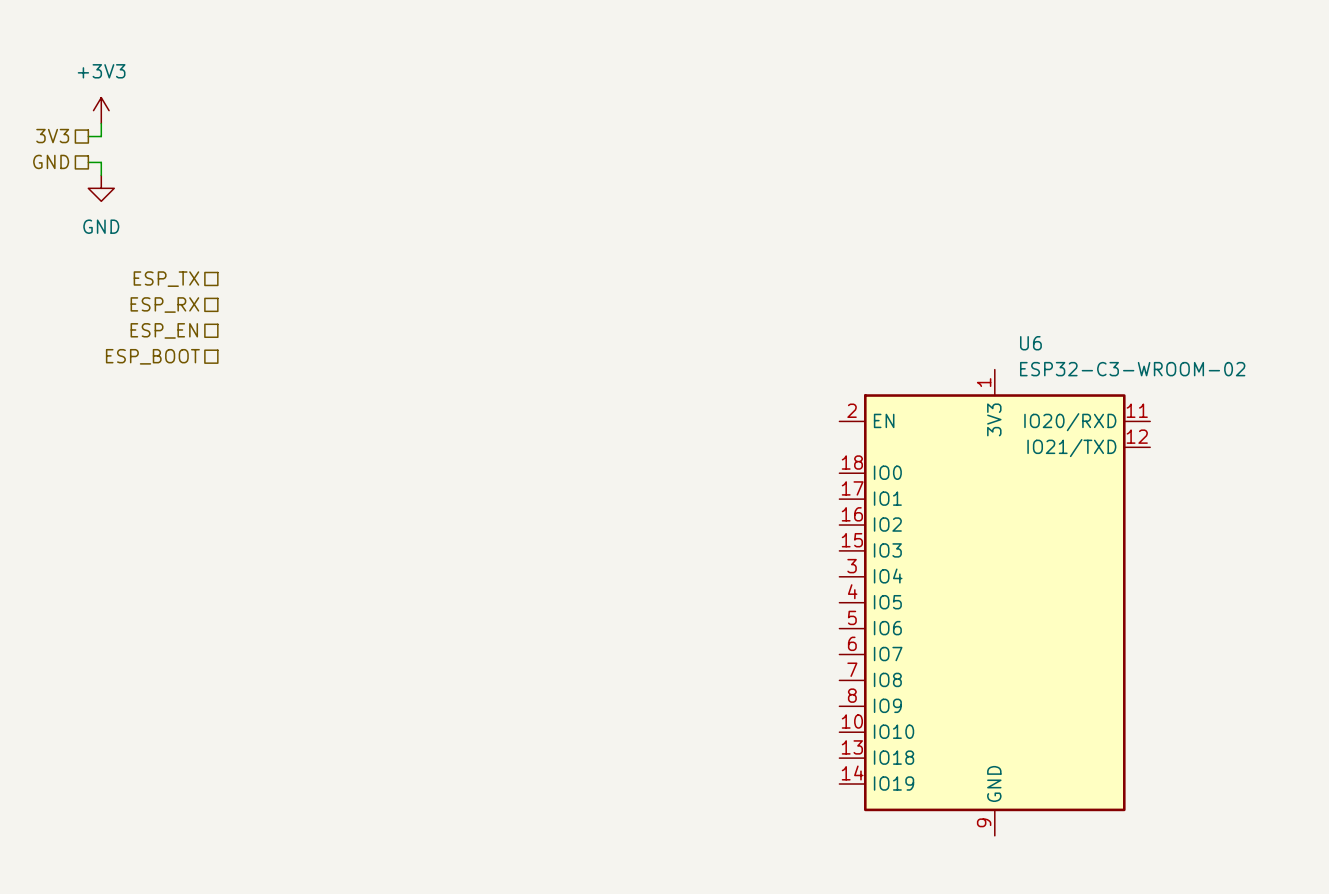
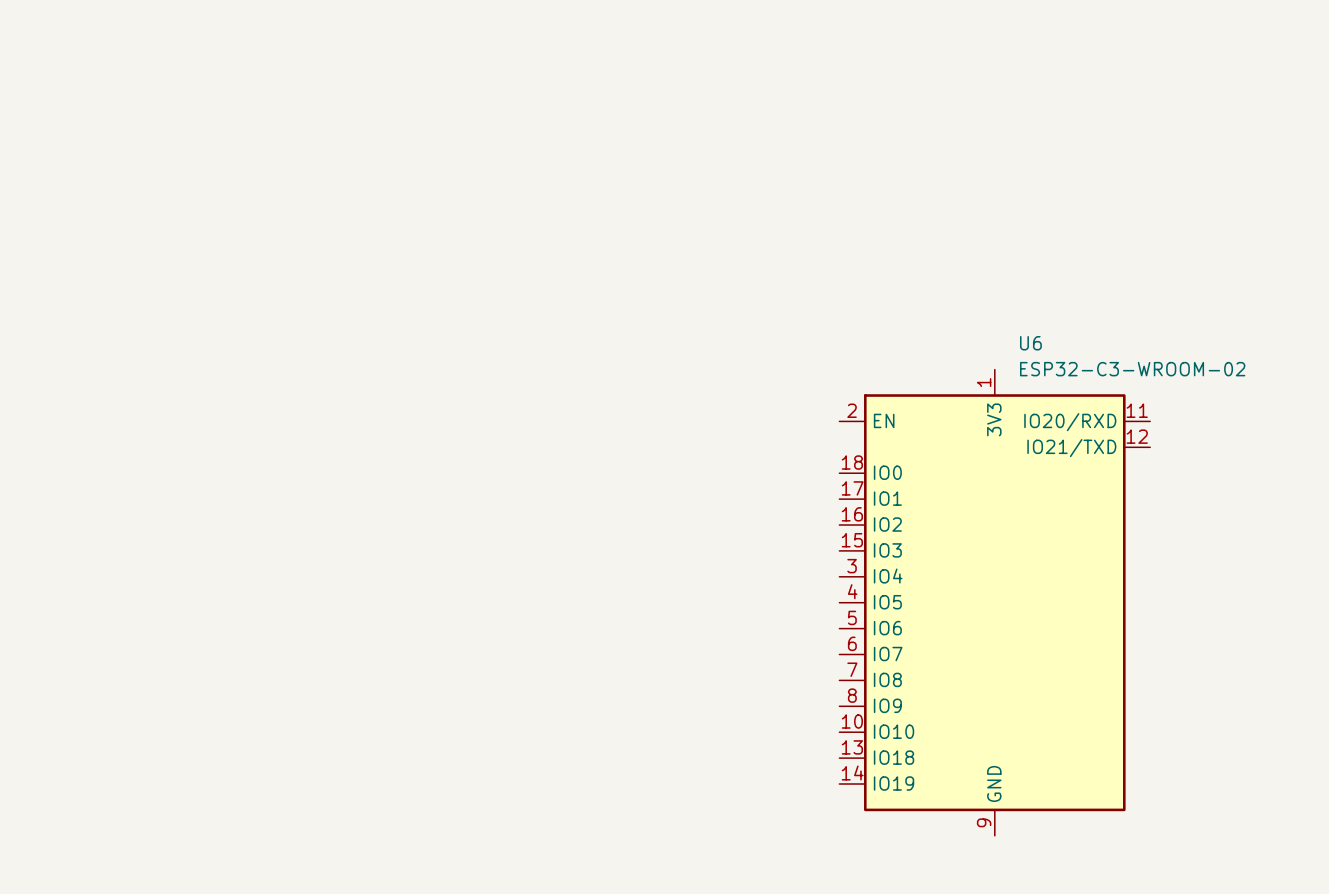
power symbol: +3V3 (101, 110) -> none
wire: (101, 123) (101, 136) (88, 136) -> none
hierarchical label: 3V3 (52, 136) -> none
hierarchical label: GND (51, 161) -> none
wire: (88, 162) (101, 162) (101, 175) -> none
power symbol: GND (101, 188) -> none
hierarchical label: ESP_TX (166, 279) -> none
hierarchical label: ESP_RX (164, 305) -> none
hierarchical label: ESP_EN (164, 330) -> none
hierarchical label: ESP_BOOT (152, 356) -> none

